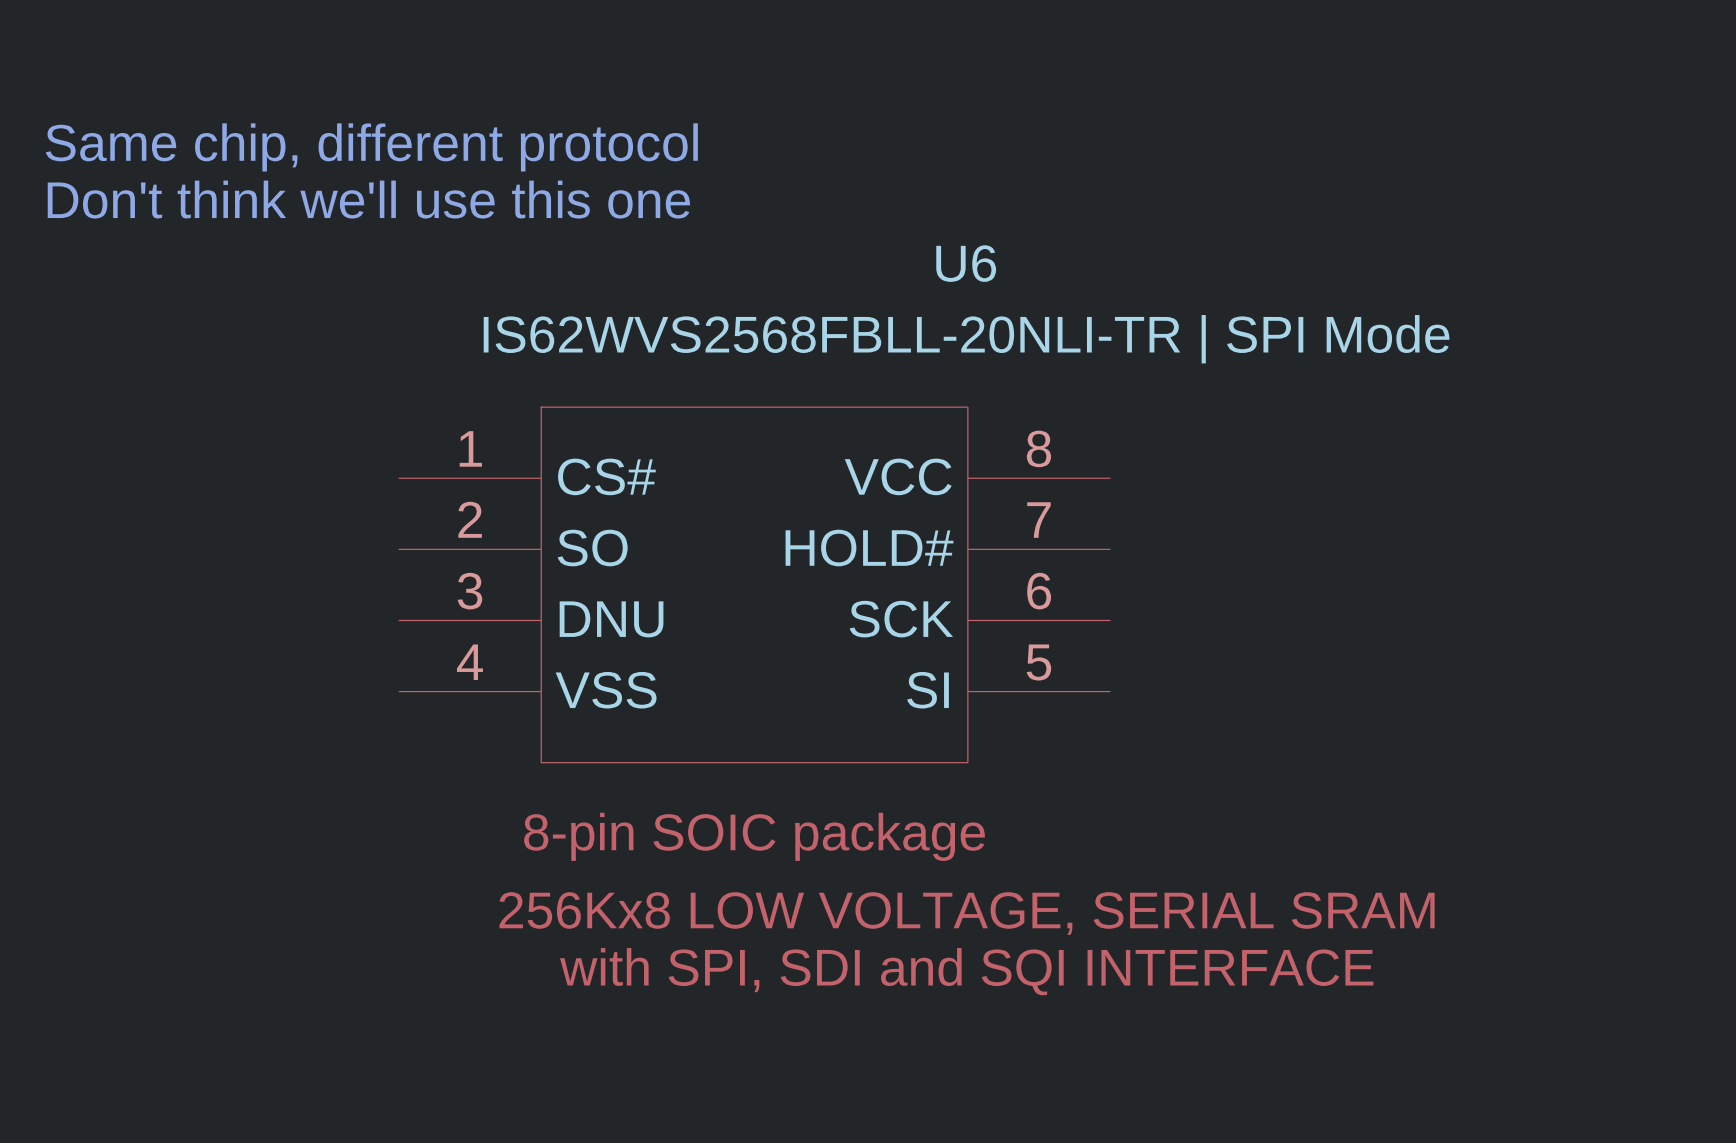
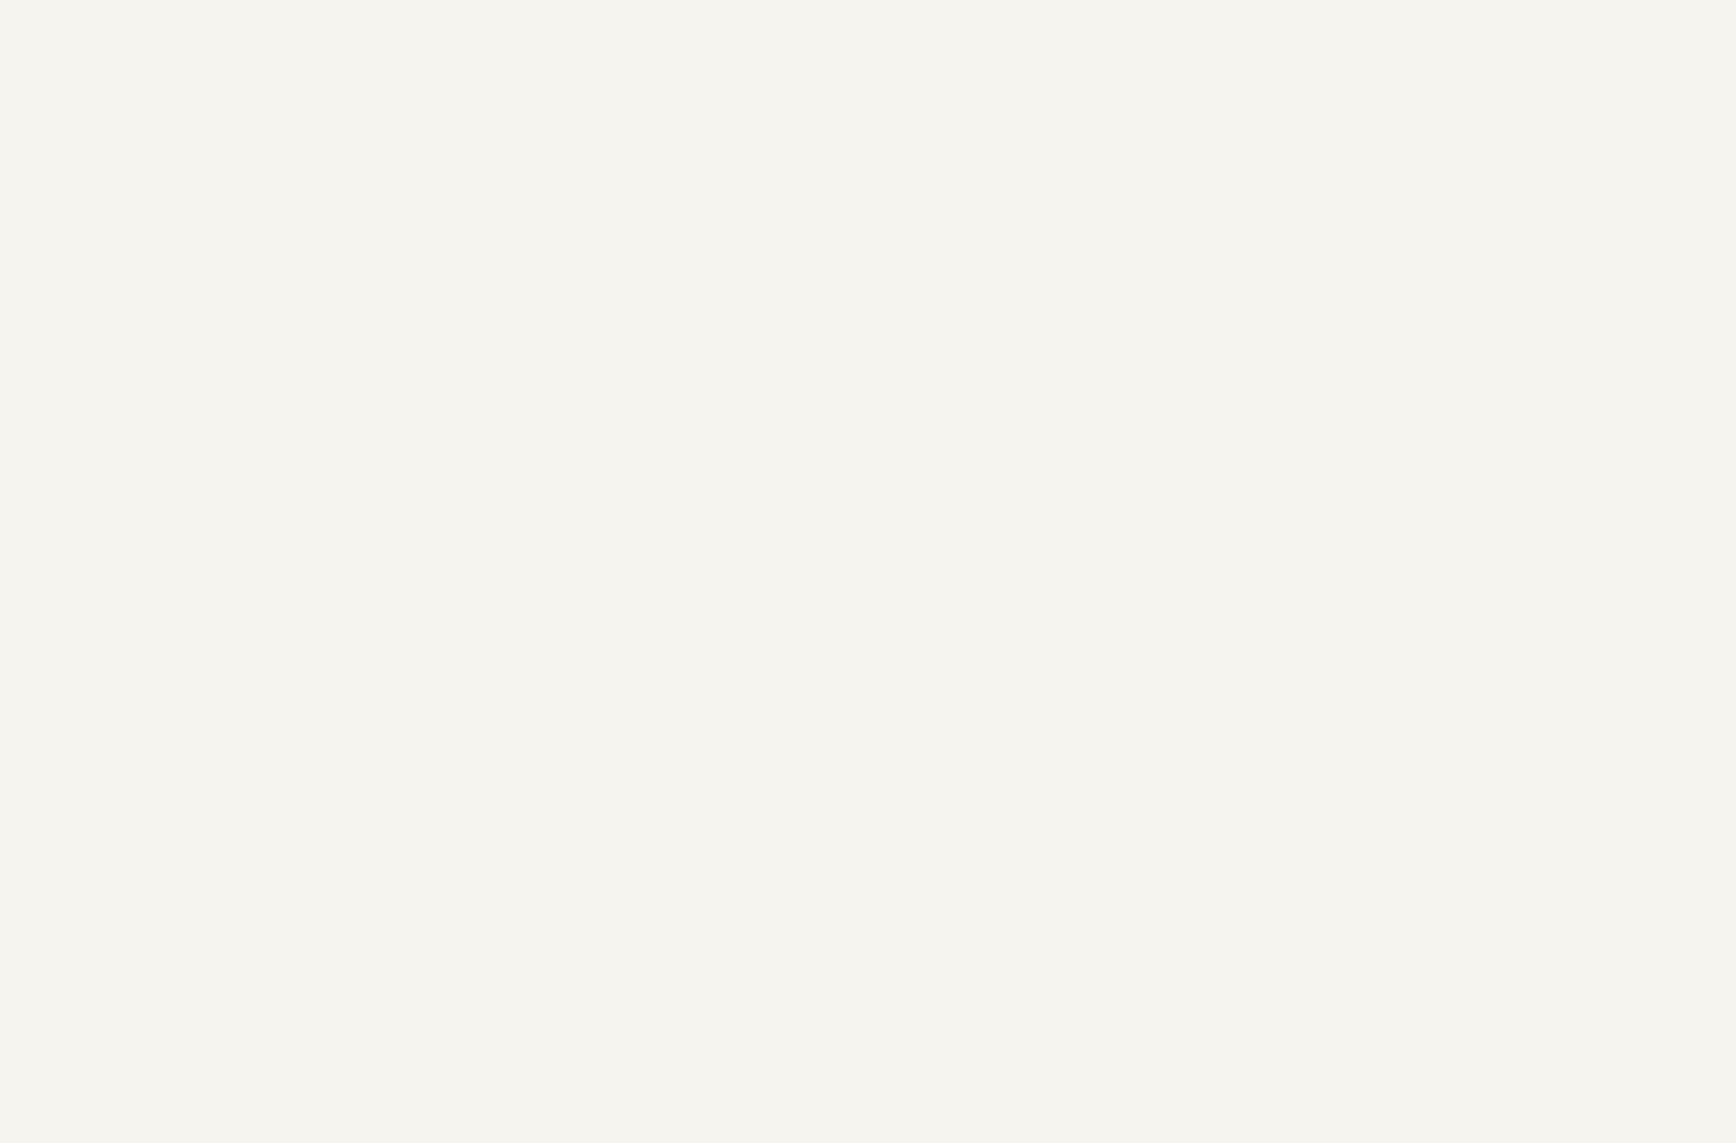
text: Same chip, different protocol (371, 147) -> none
text: Don't think we'll use this one (368, 199) -> none
U6: IS62WVS2568FBLL-20NLI-TR | SPI Mode (754, 584) -> none

